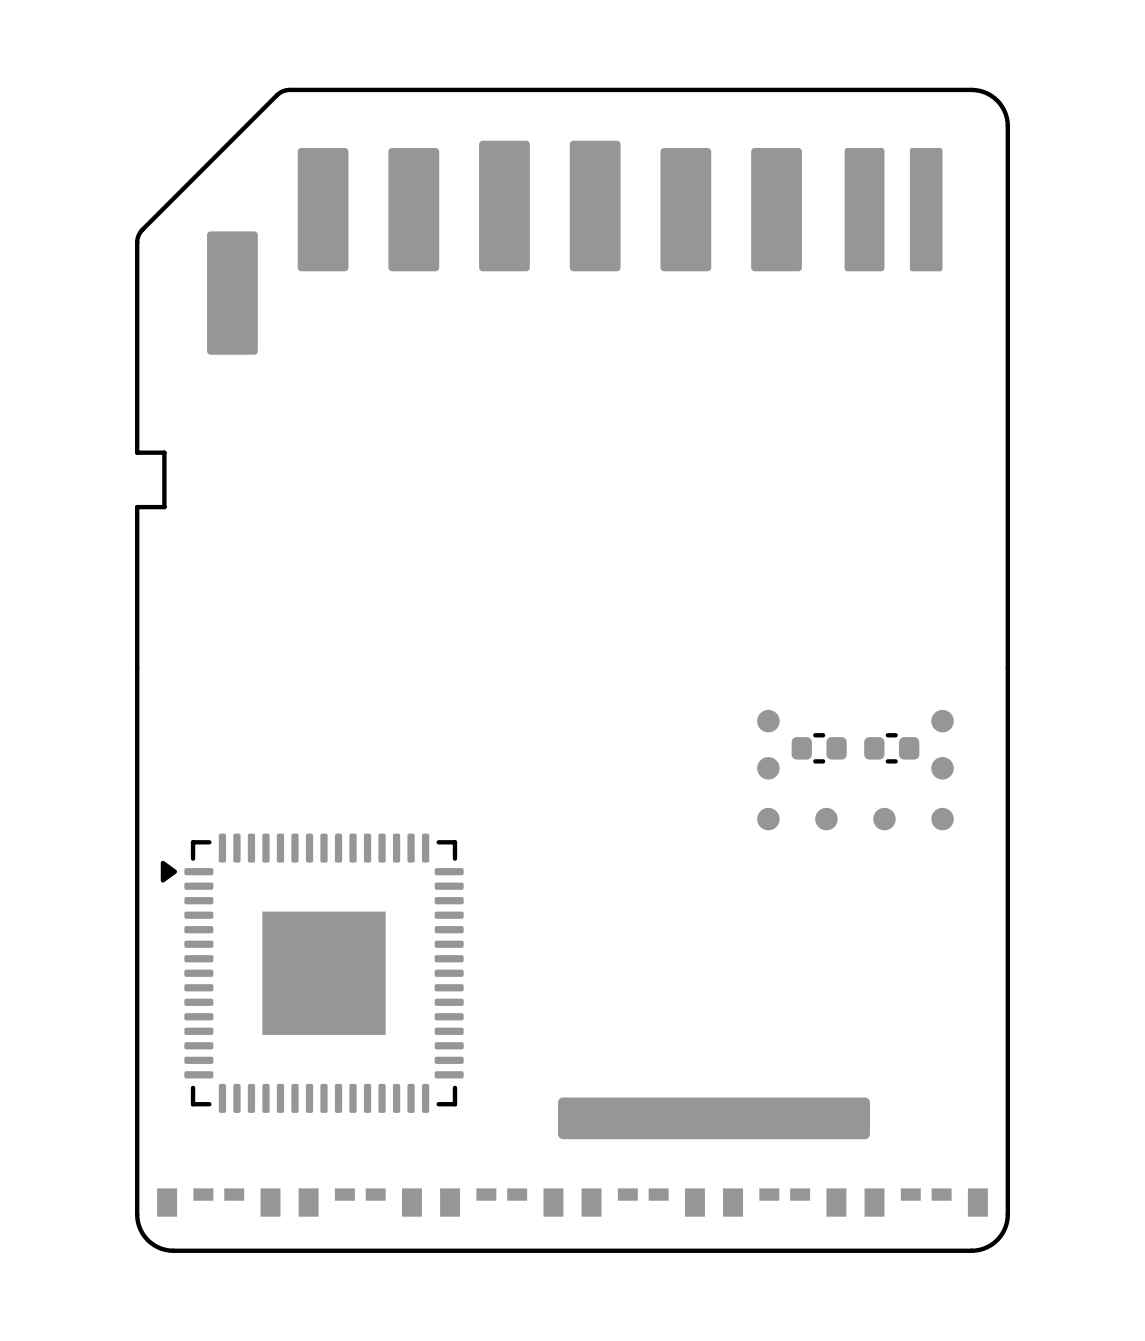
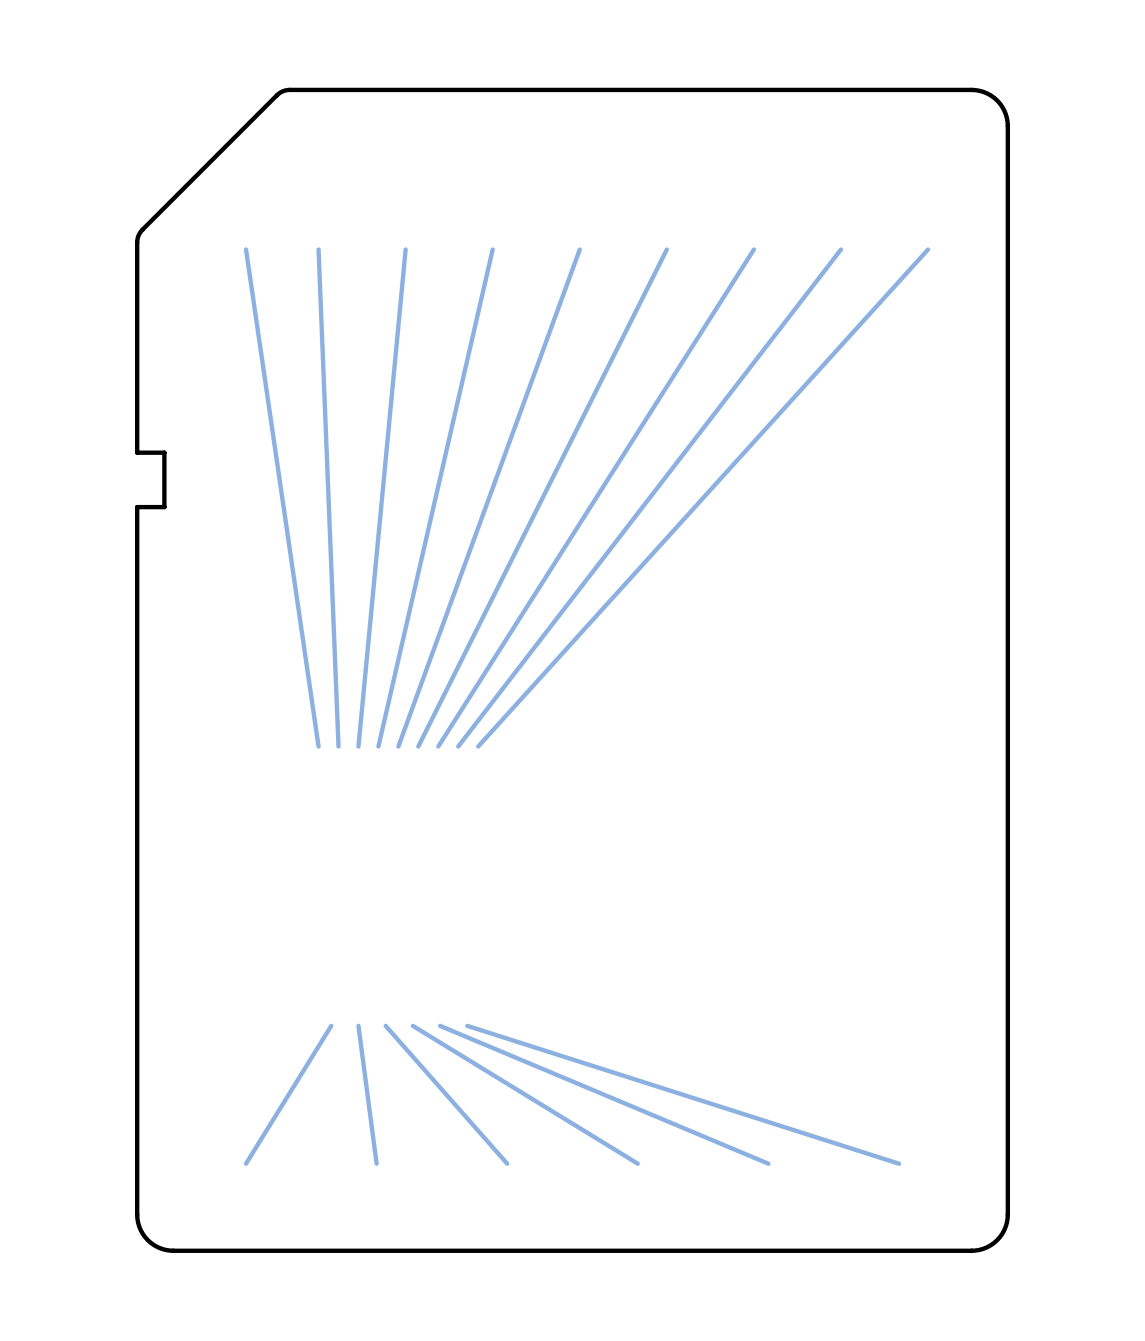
track: none -> (246, 249) (318, 746)
track: none -> (318, 249) (338, 746)
track: none -> (405, 249) (358, 746)
track: none -> (492, 249) (378, 746)
track: none -> (579, 249) (398, 746)
track: none -> (666, 249) (418, 746)
track: none -> (753, 249) (438, 746)
track: none -> (840, 249) (458, 746)
track: none -> (928, 249) (478, 746)
part: (572, 379) -> none
part: (768, 721) -> none
part: (942, 721) -> none
part: (819, 748) -> none
part: (891, 748) -> none
part: (768, 768) -> none
part: (942, 768) -> none
part: (768, 819) -> none
part: (826, 819) -> none
part: (884, 819) -> none
part: (942, 819) -> none
part: (312, 973) -> none
track: none -> (331, 1025) (246, 1163)
track: none -> (358, 1025) (376, 1163)
track: none -> (385, 1025) (507, 1163)
track: none -> (412, 1025) (637, 1163)
track: none -> (440, 1025) (768, 1163)
track: none -> (467, 1025) (898, 1163)
part: (713, 1118) -> none
part: (218, 1202) -> none
part: (360, 1202) -> none
part: (501, 1202) -> none
part: (643, 1202) -> none
part: (784, 1202) -> none
part: (926, 1202) -> none

